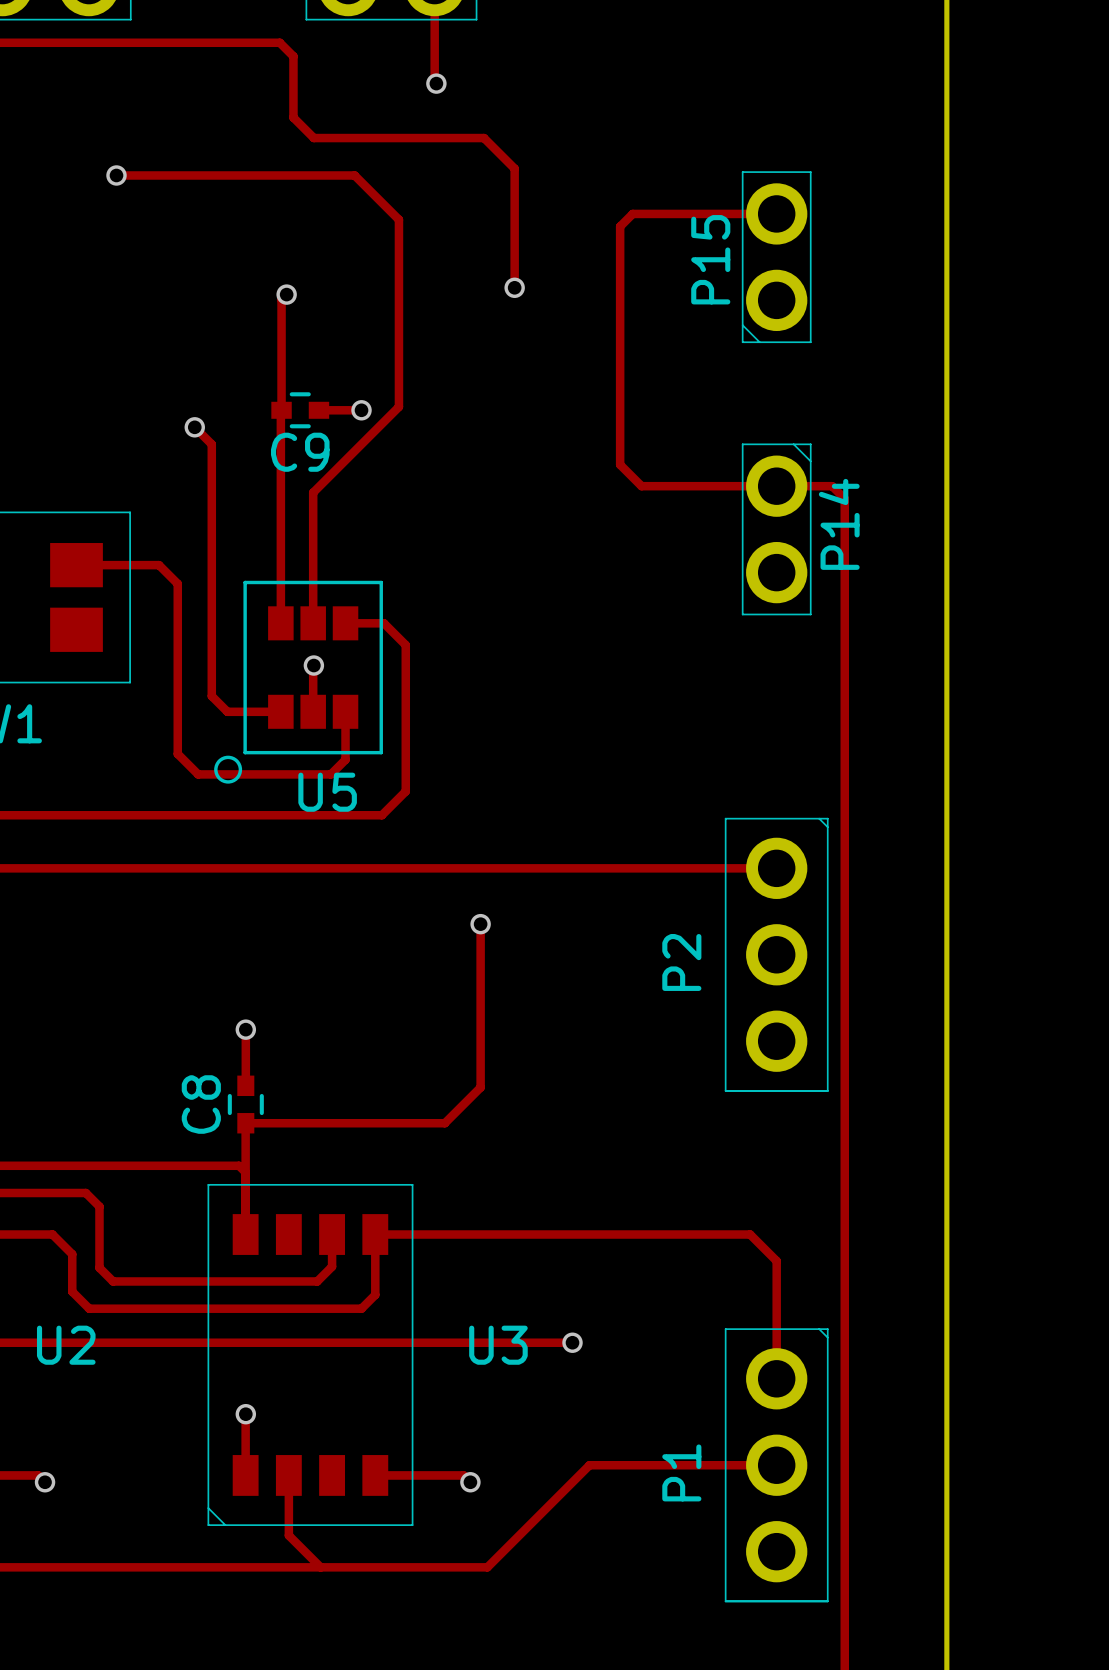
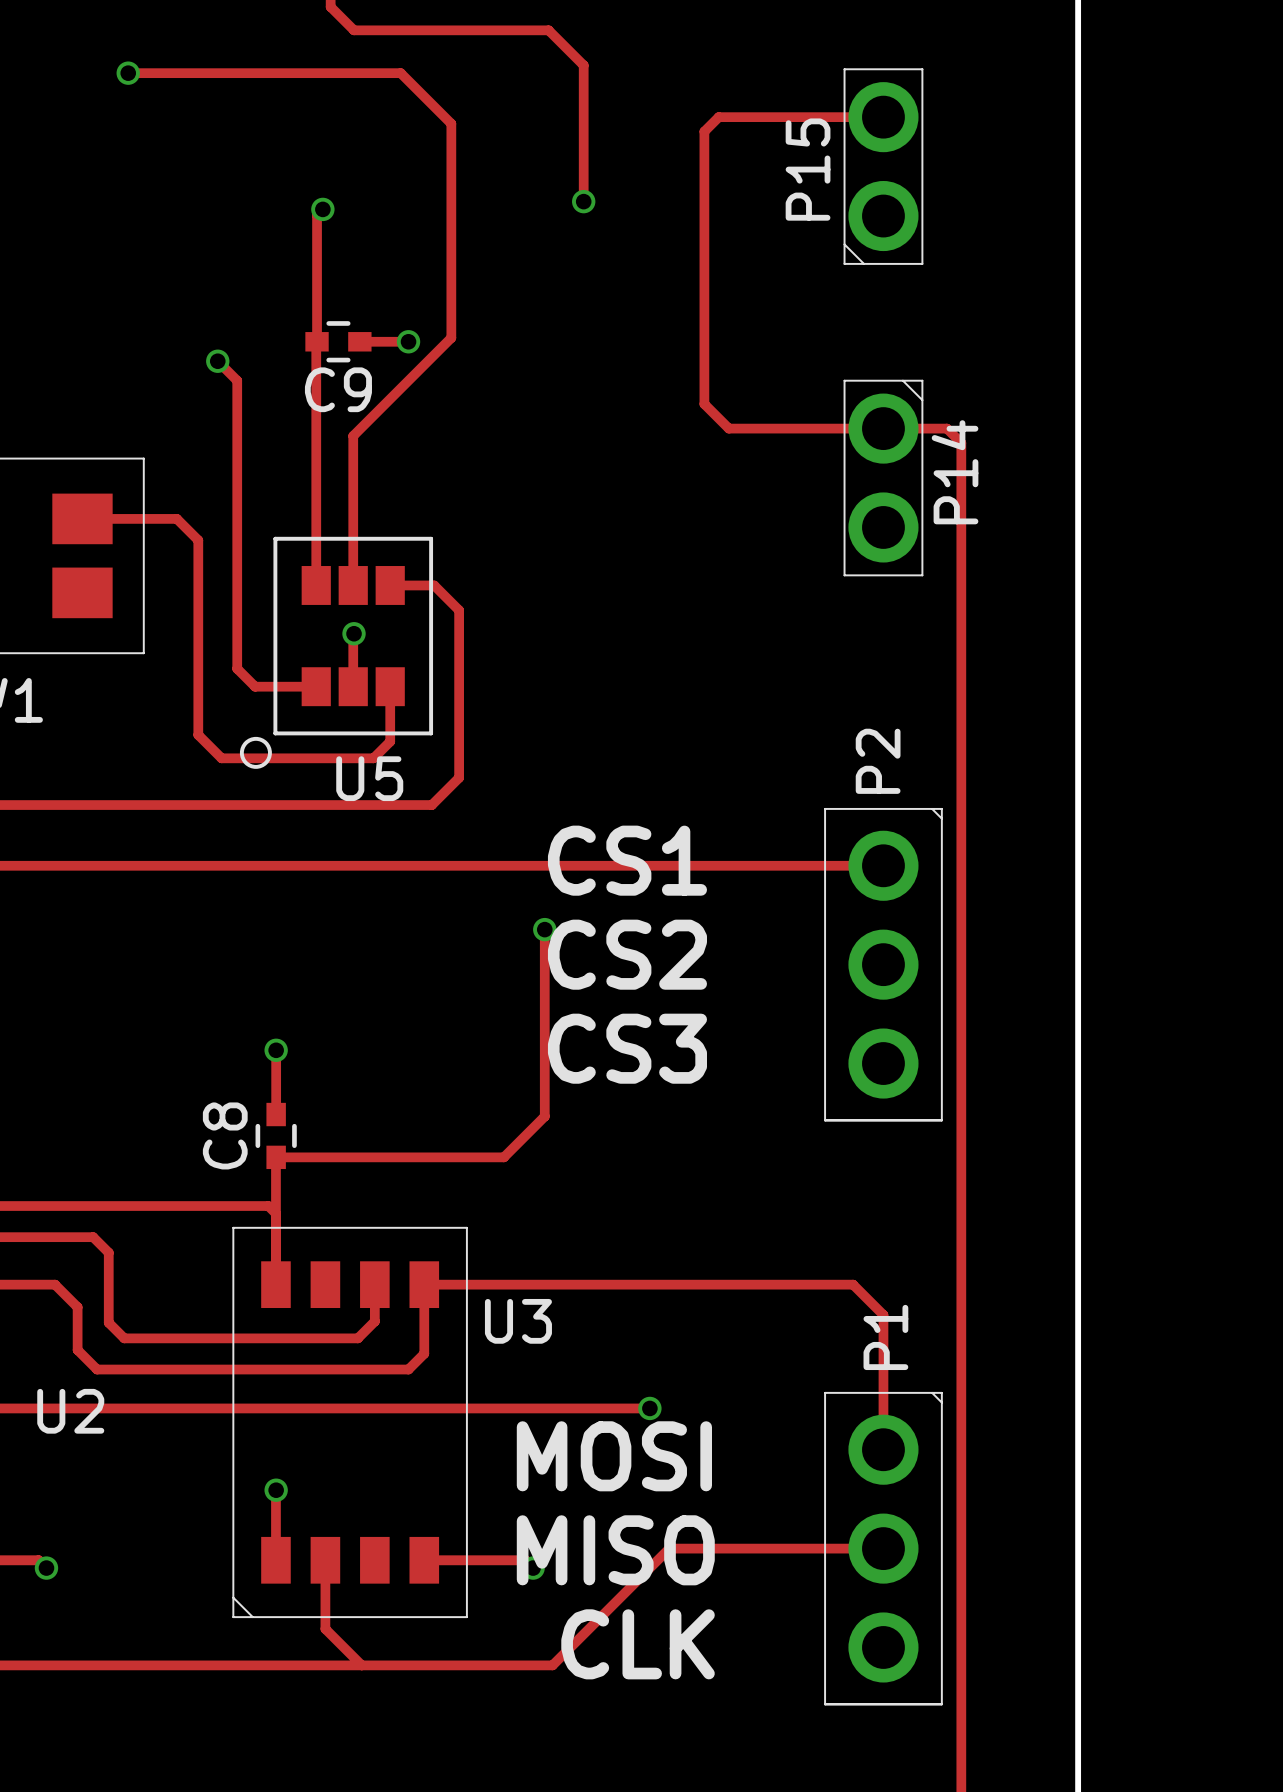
text: none -> CS1 (627, 860)
text: none -> CS2 (627, 954)
P2 name position: P2 (681, 962) -> P2 (878, 761)
text: none -> CS3 (627, 1048)
U3 name position: U3 (498, 1345) -> U3 (518, 1321)
text: none -> MOSI (614, 1456)
text: none -> MISO (615, 1550)
P1 name position: P1 (681, 1472) -> P1 (885, 1337)
text: none -> CLK (638, 1644)

